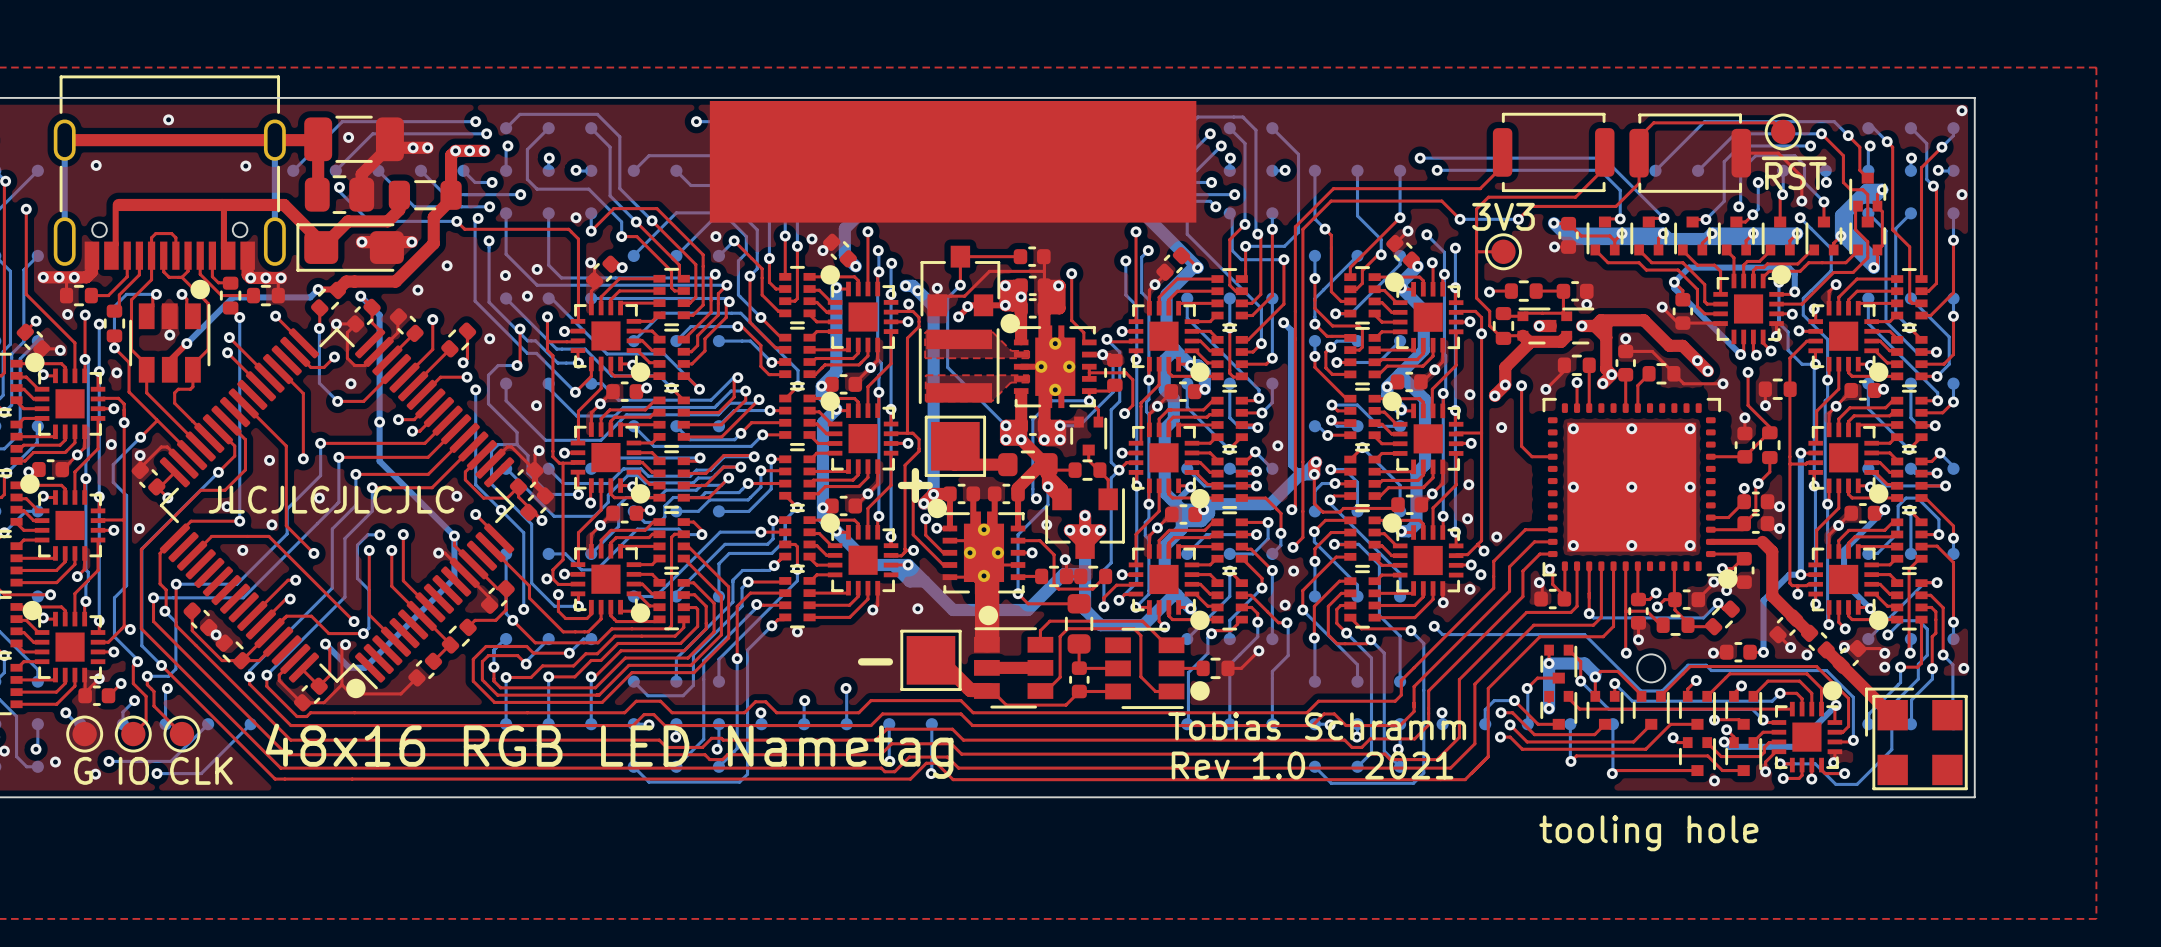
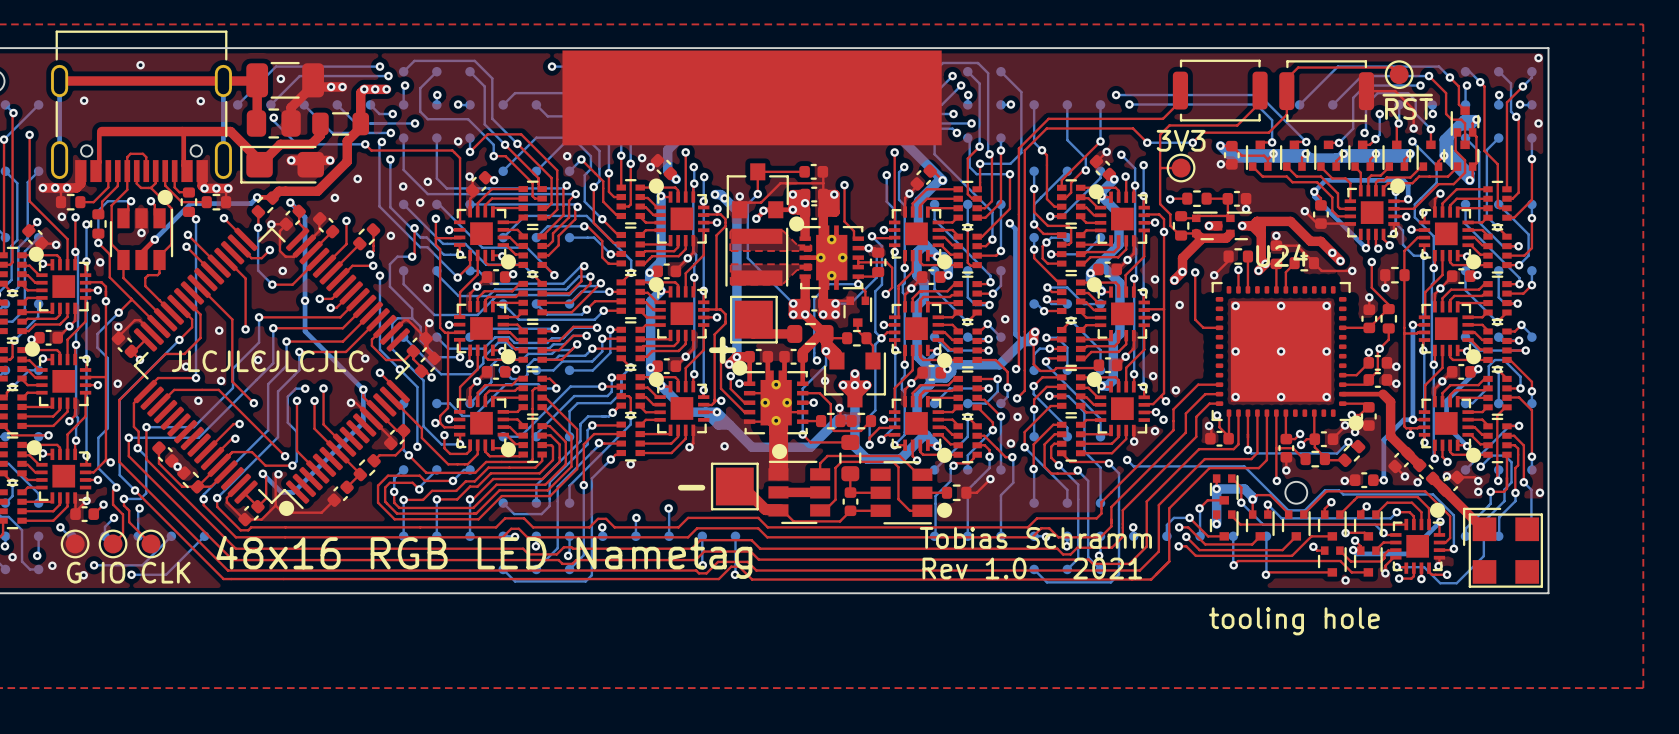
U24 name: none -> U24 (1282, 255)

